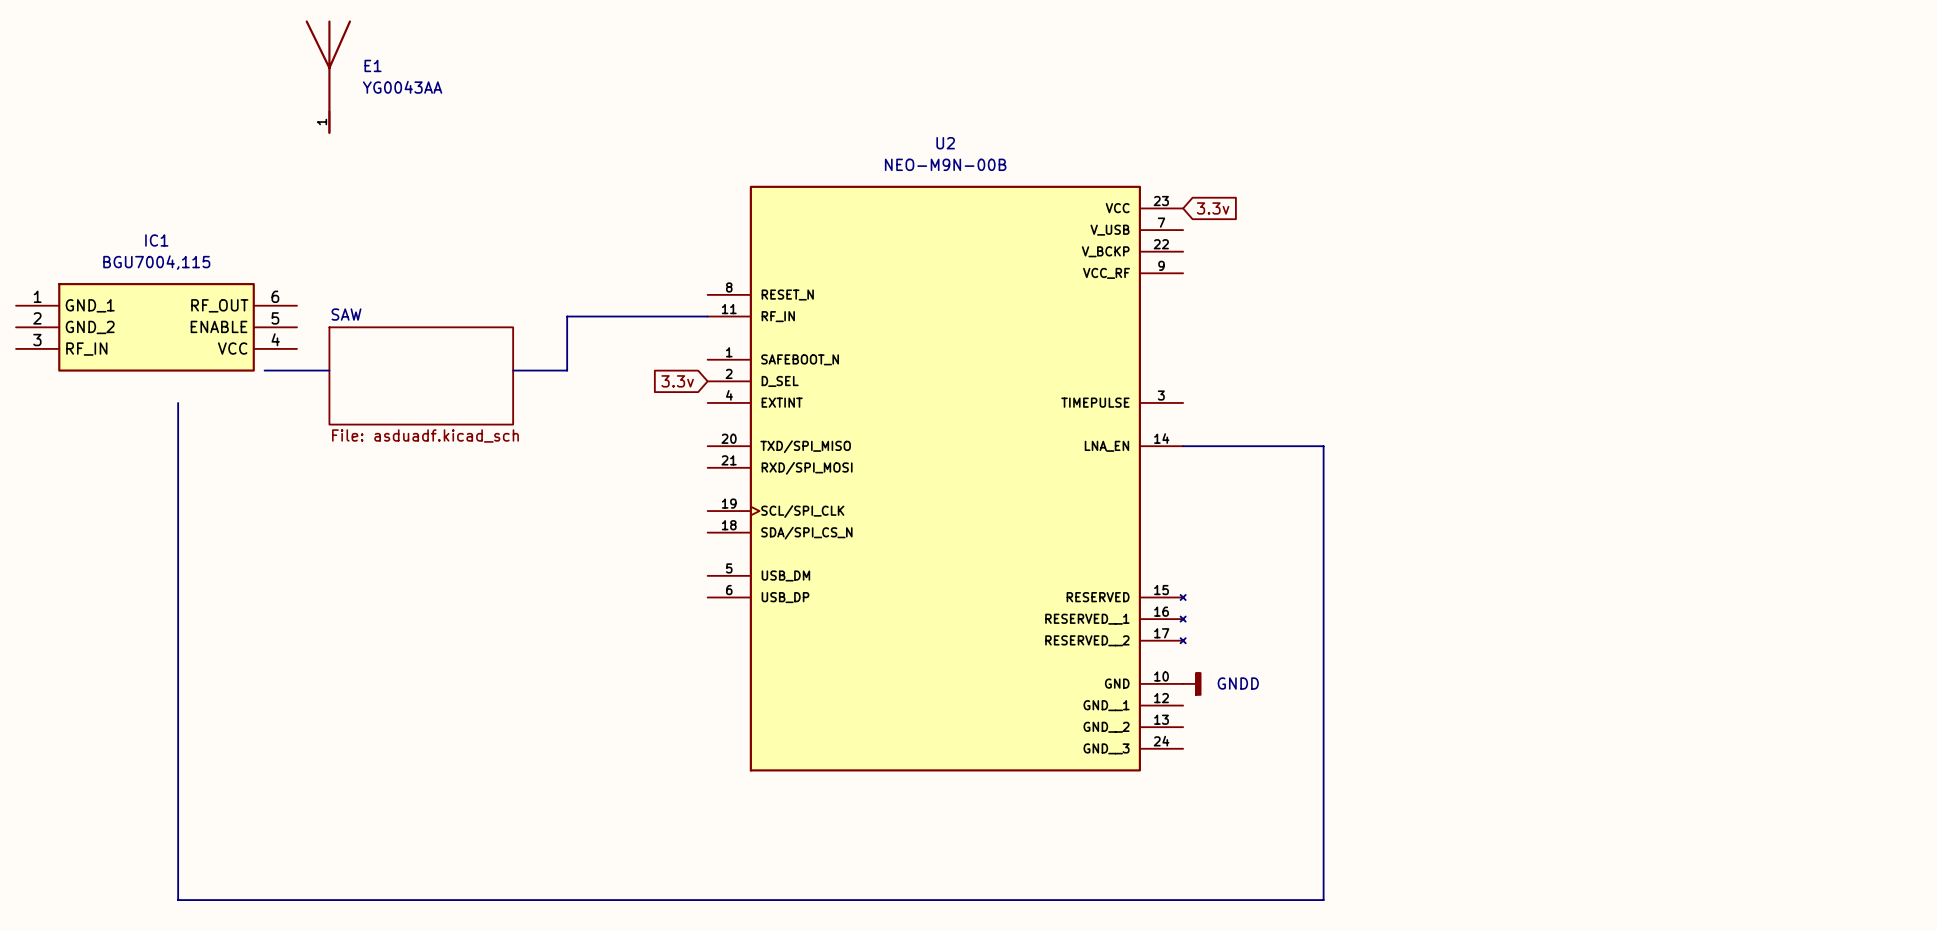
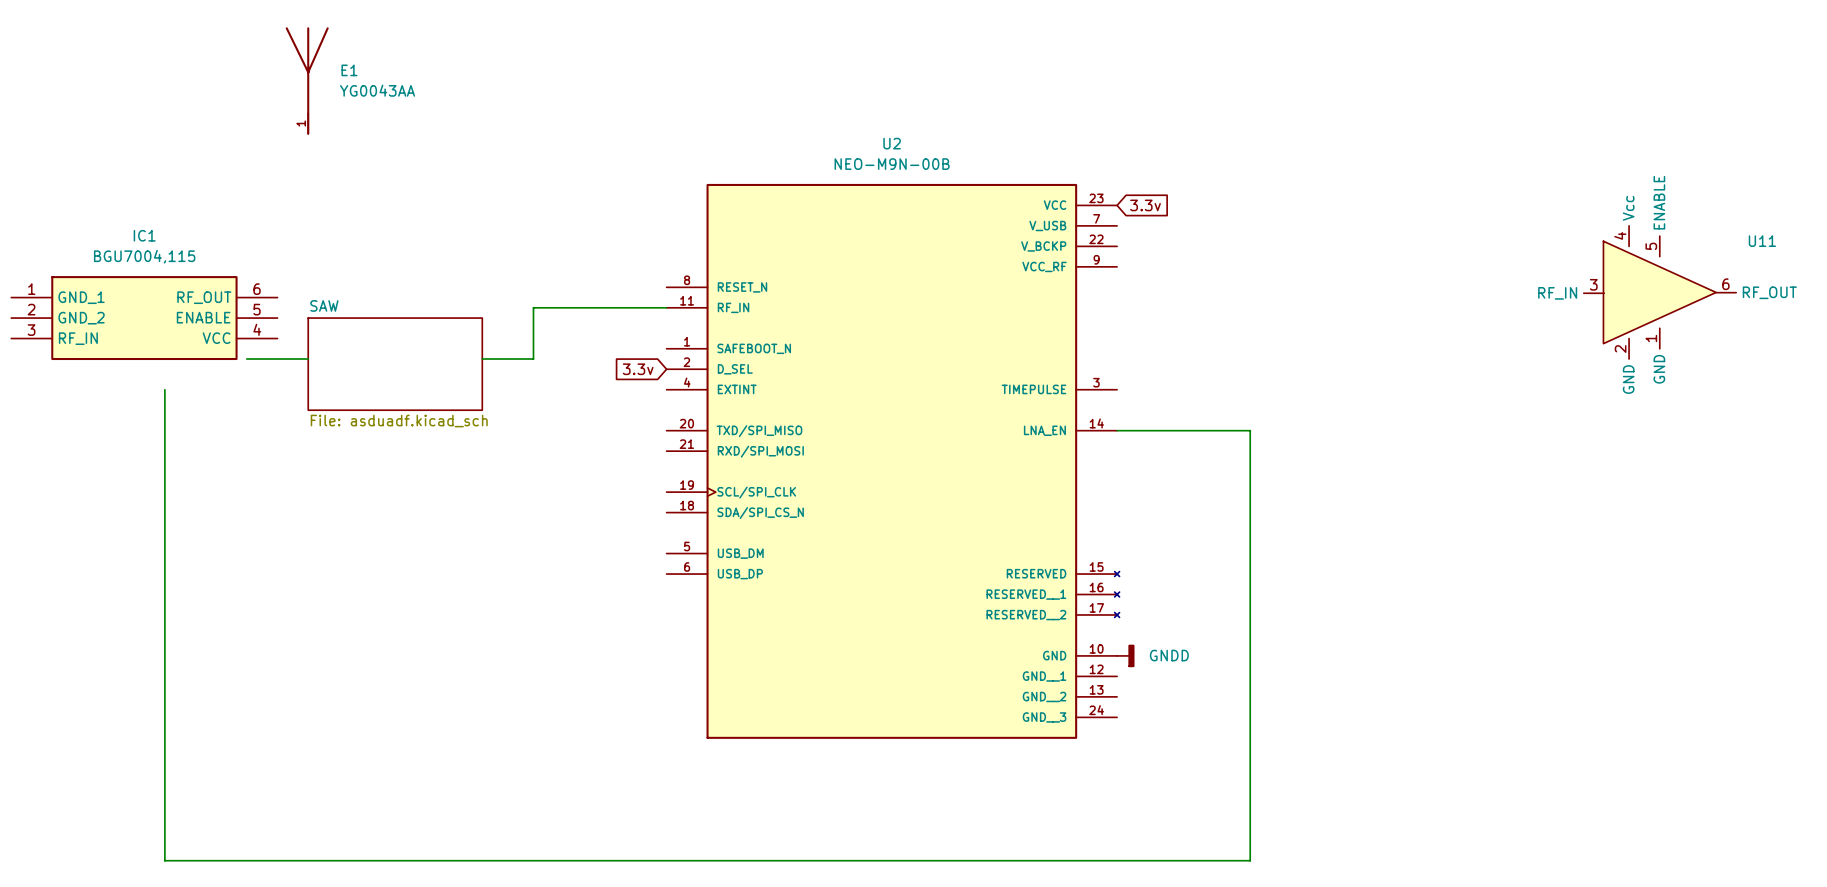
U11: none -> (1659, 292)

